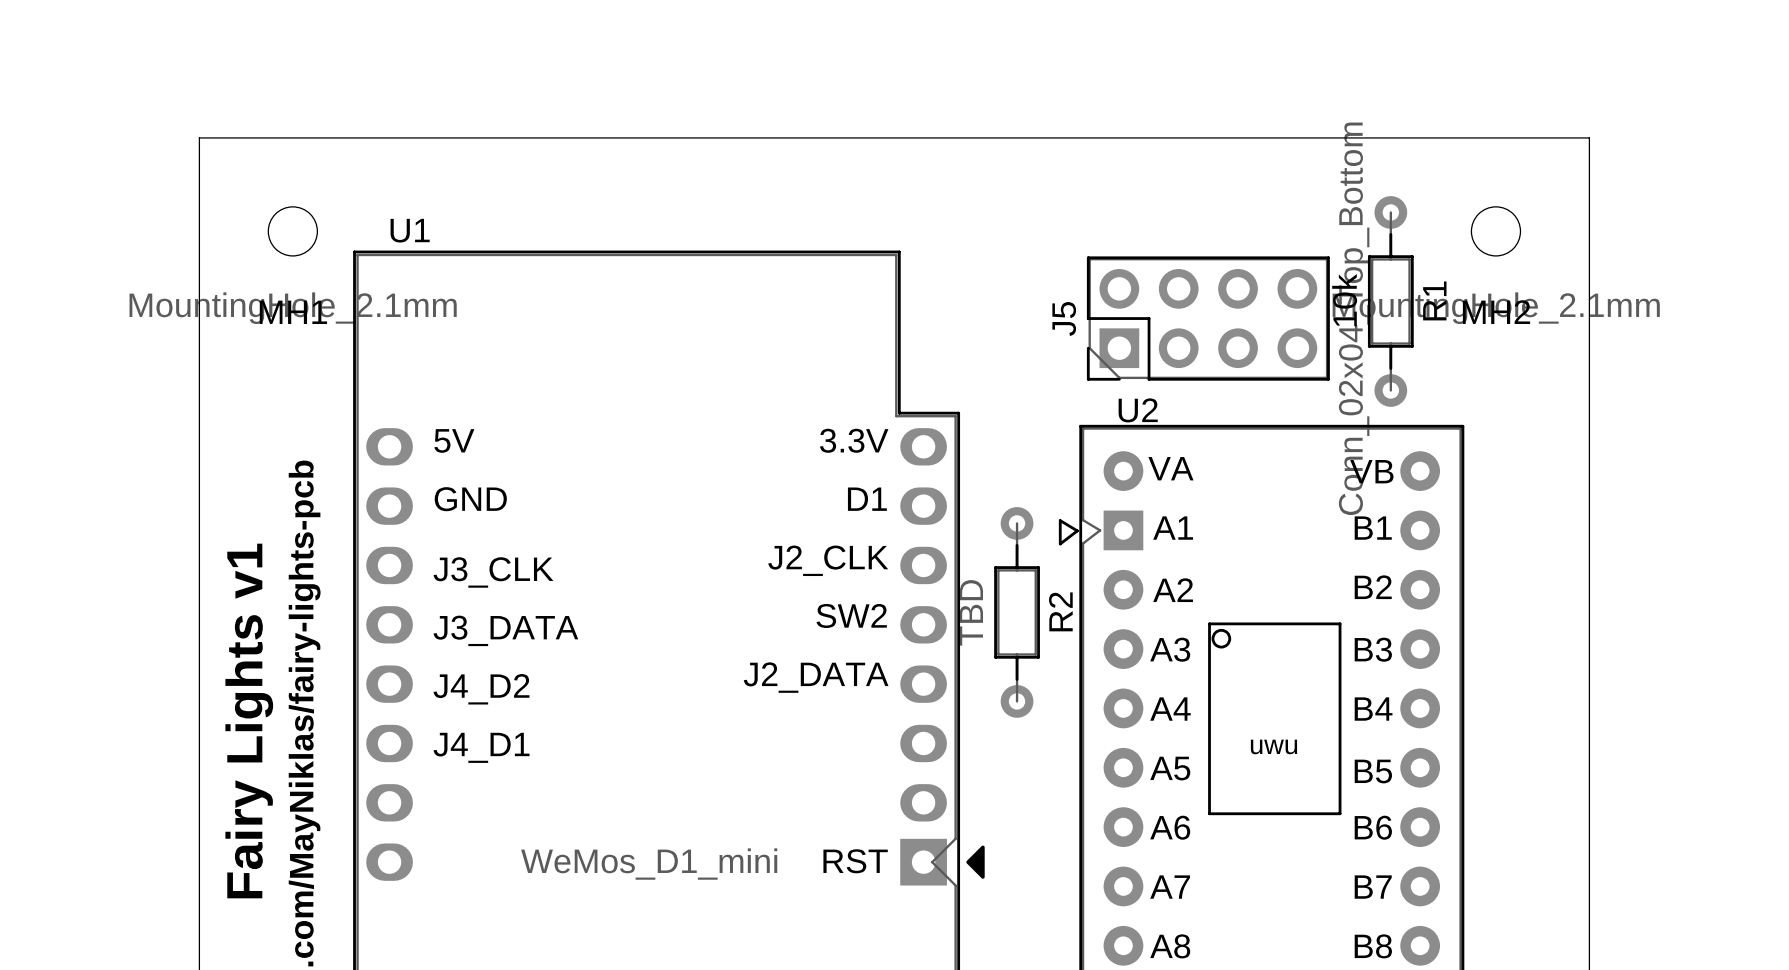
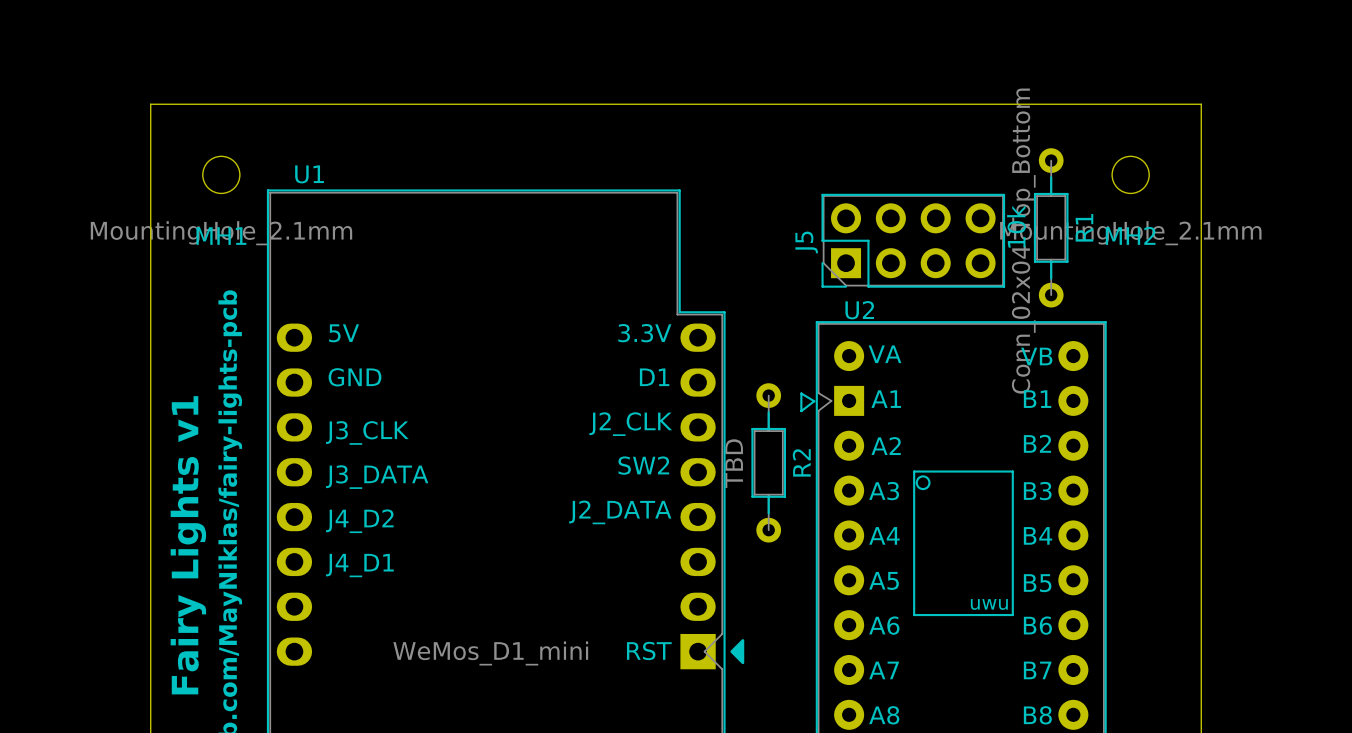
text position: uwu (1274, 746) -> uwu (989, 604)

